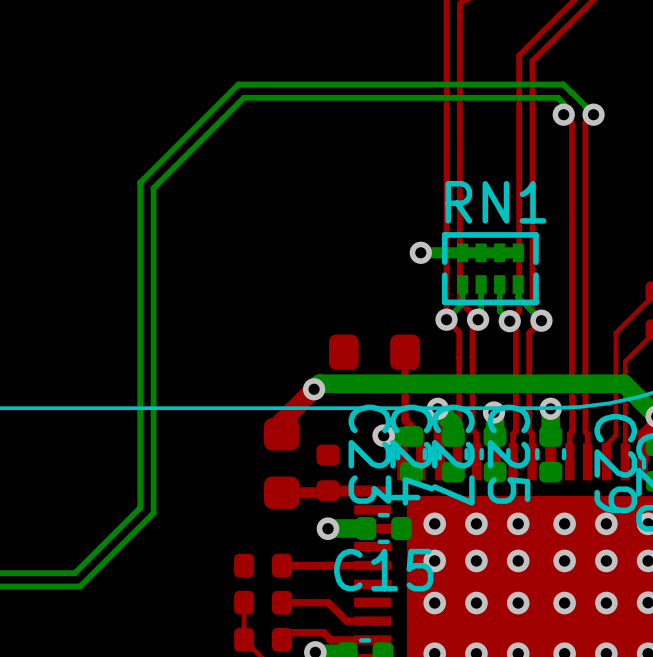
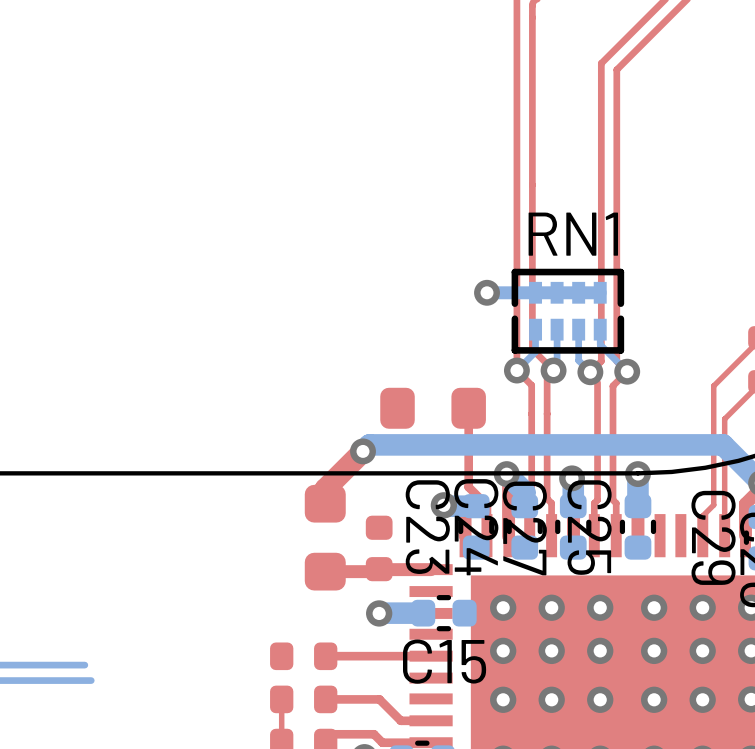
bottom track: (572, 93) (585, 105) -> none
bottom track: (572, 93) (563, 84) (238, 84) (140, 182) (140, 507) (74, 573) -> none
top track: (563, 114) (572, 122) (572, 399) -> none
bottom track: (563, 114) (563, 103) (557, 97) (243, 97) (153, 188) (153, 513) (80, 586) -> none
via: (563, 114) -> none
top track: (593, 114) (585, 122) (585, 394) -> none
via: (593, 114) -> none
top track: (585, 394) (587, 461) -> none
top track: (572, 399) (569, 461) -> none

